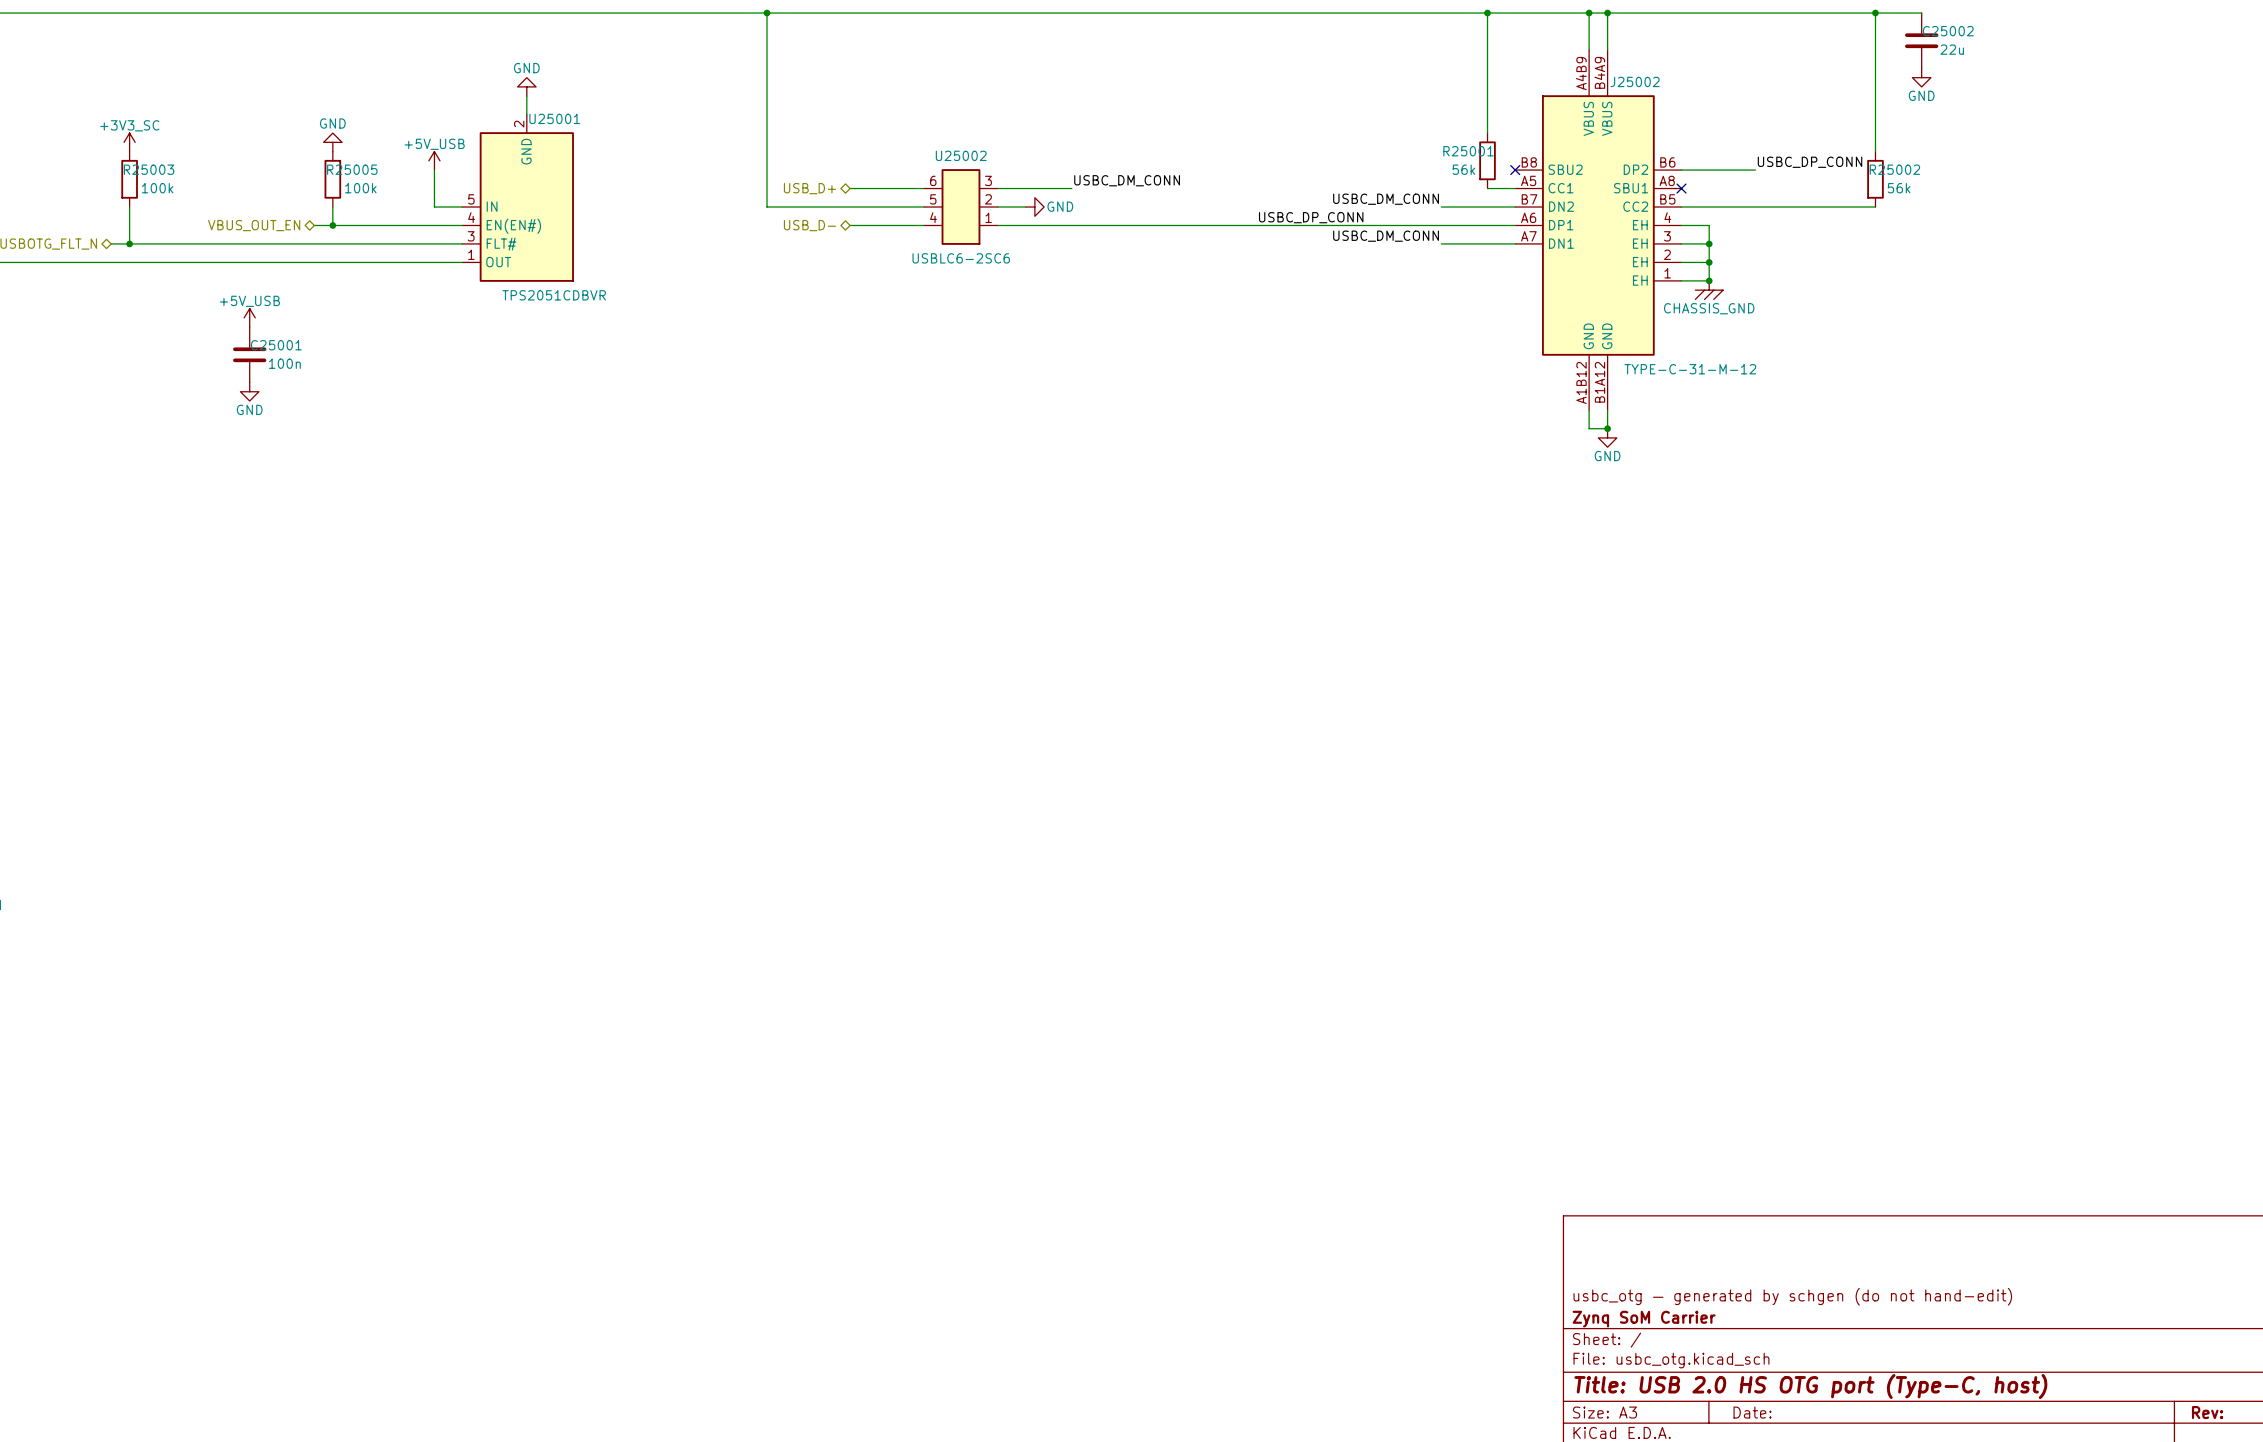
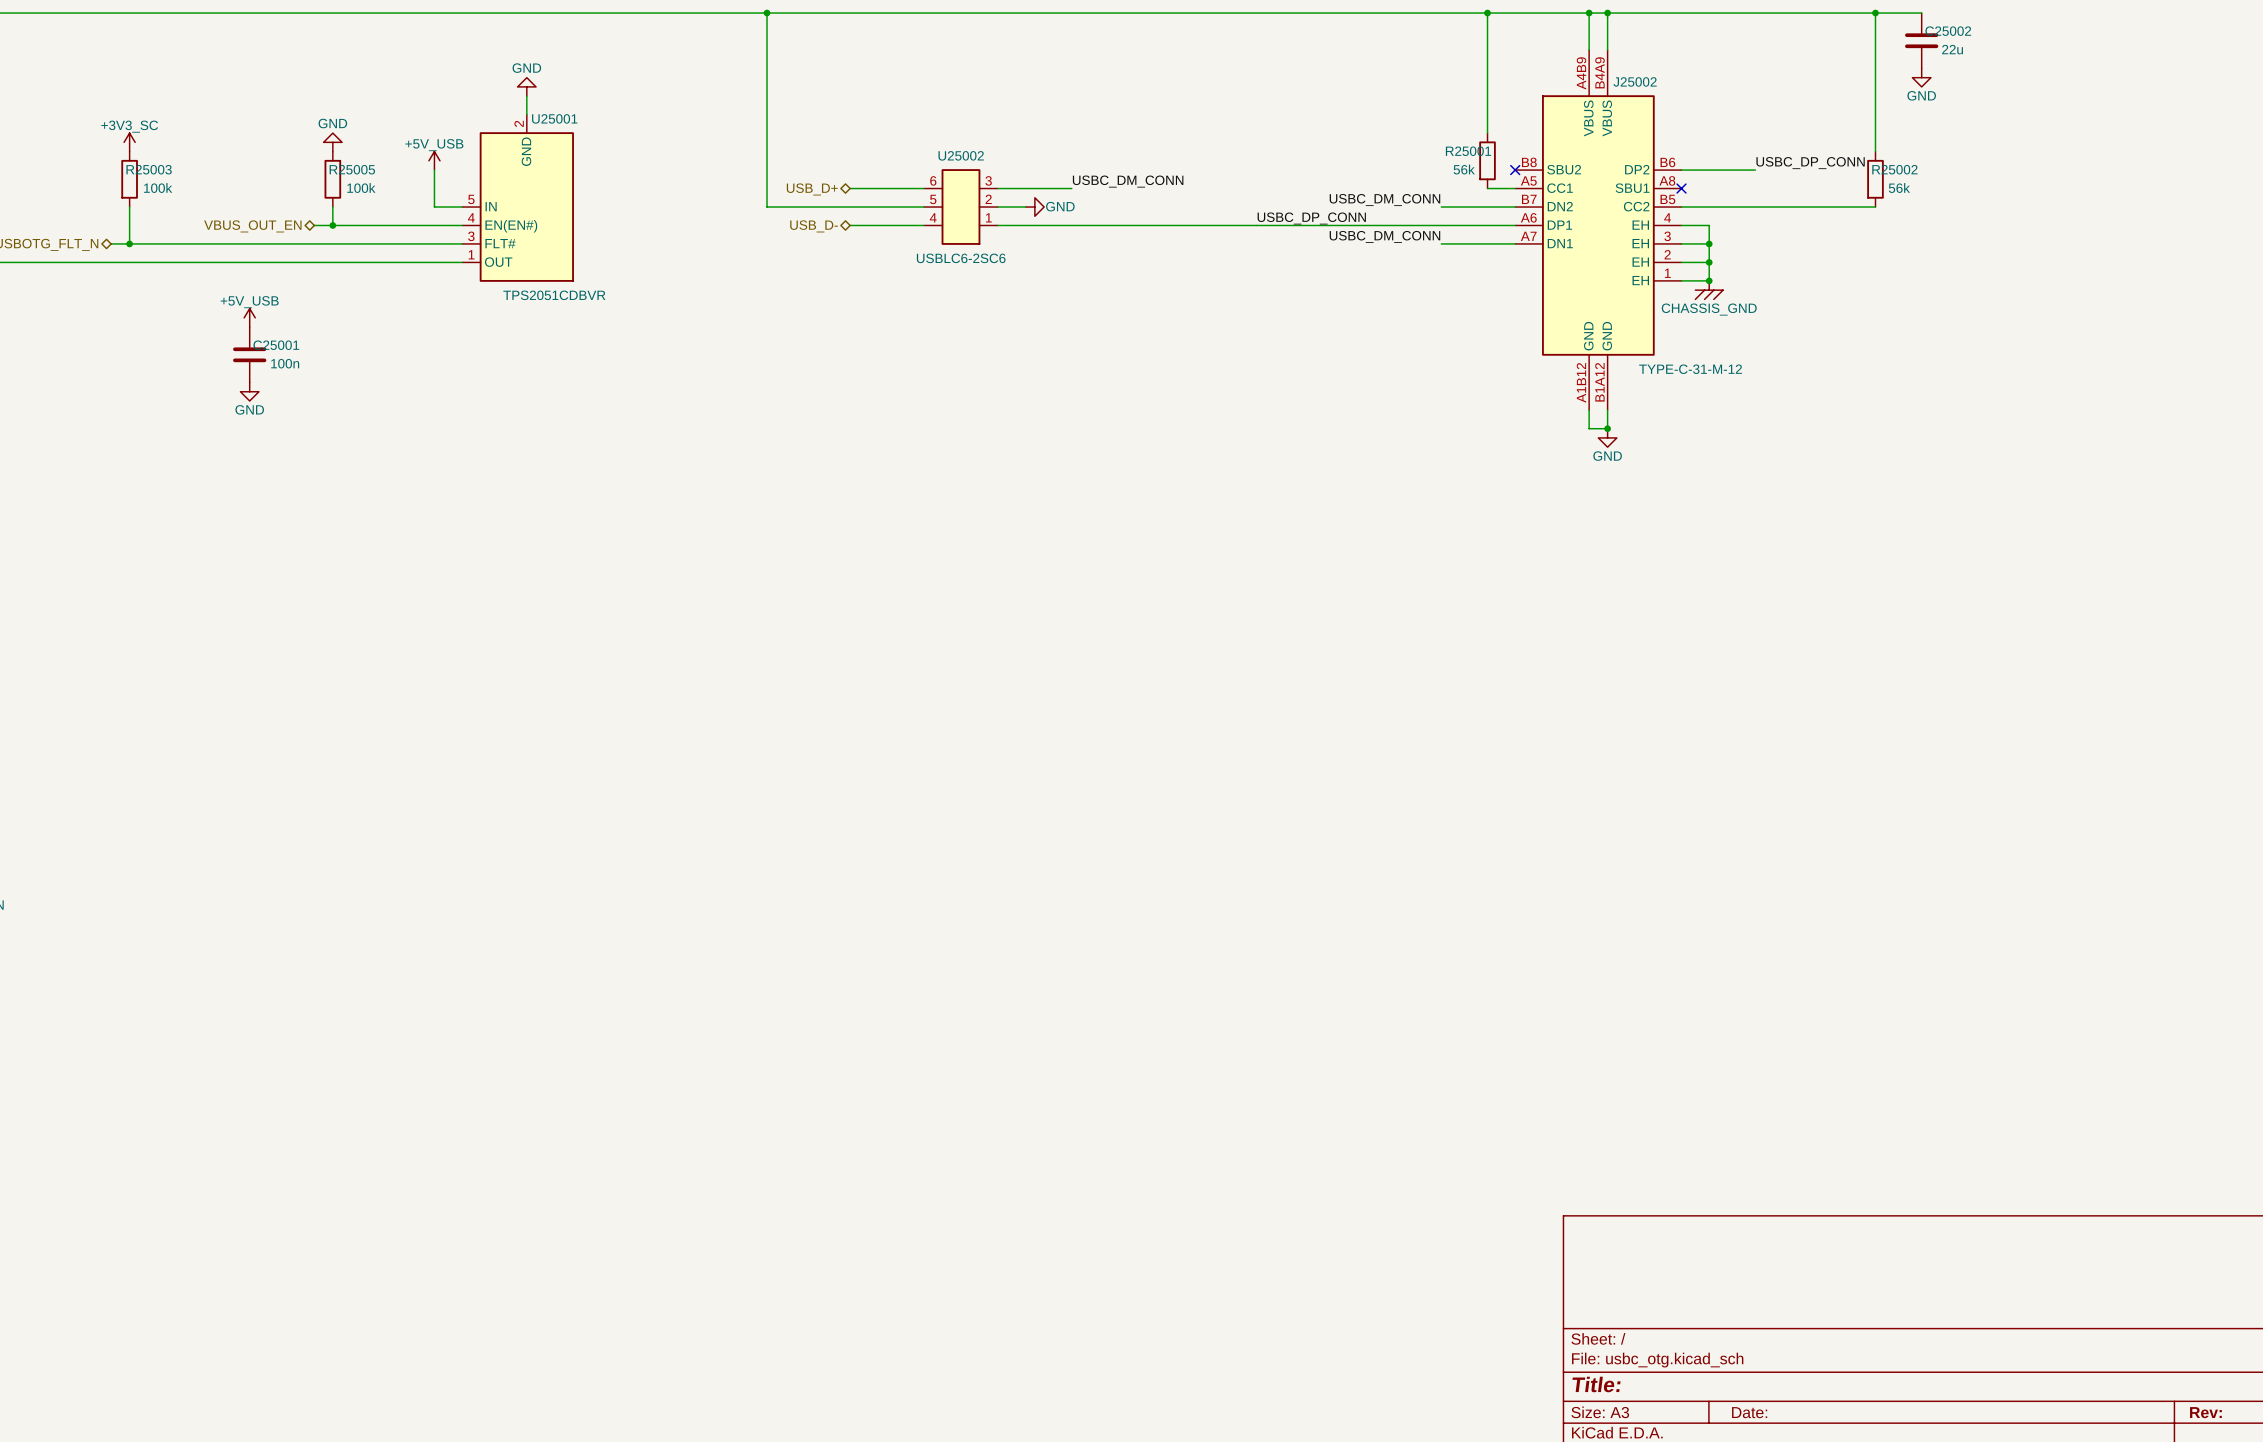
title block: usbc_otg — generated by schgen (do not hand-edit) (1792, 1296) -> none
title block: Zynq SoM Carrier (1644, 1319) -> none
title block: Title: USB 2.0 HS OTG port (Type-C, host) (1810, 1386) -> Title: (1596, 1384)

